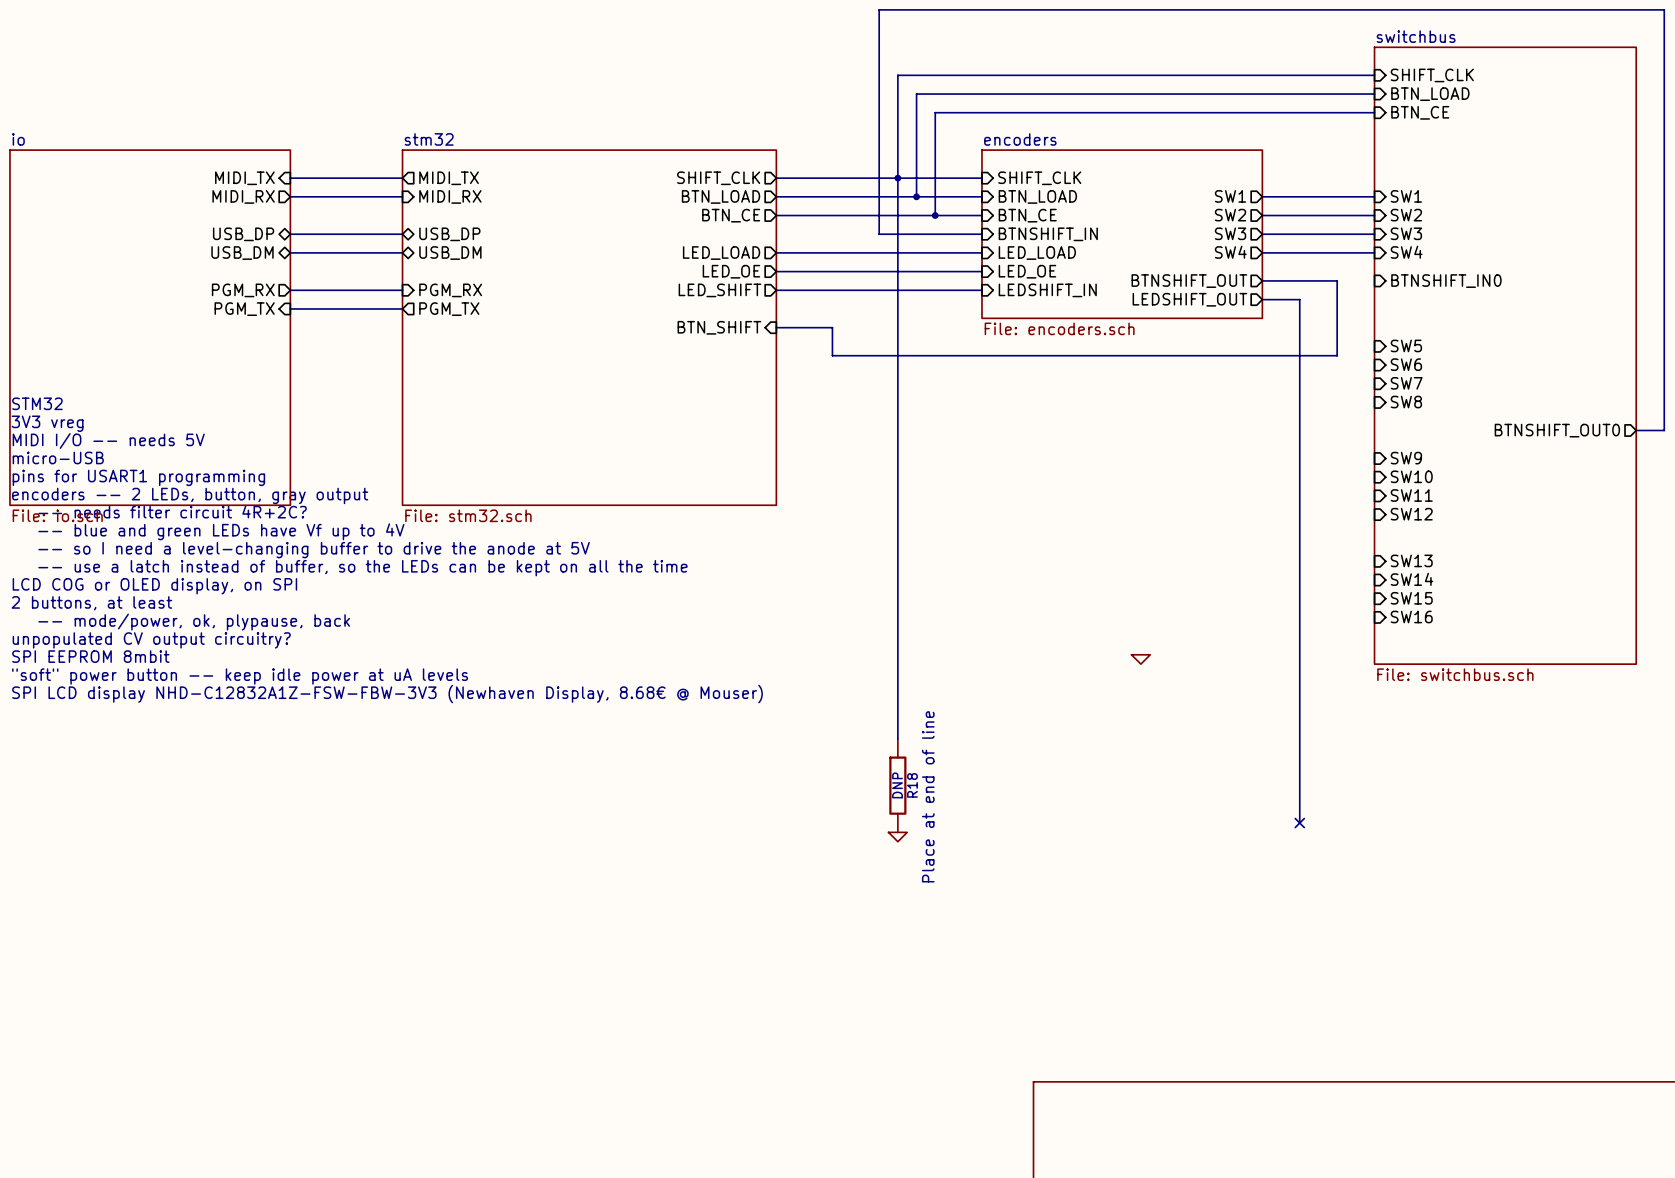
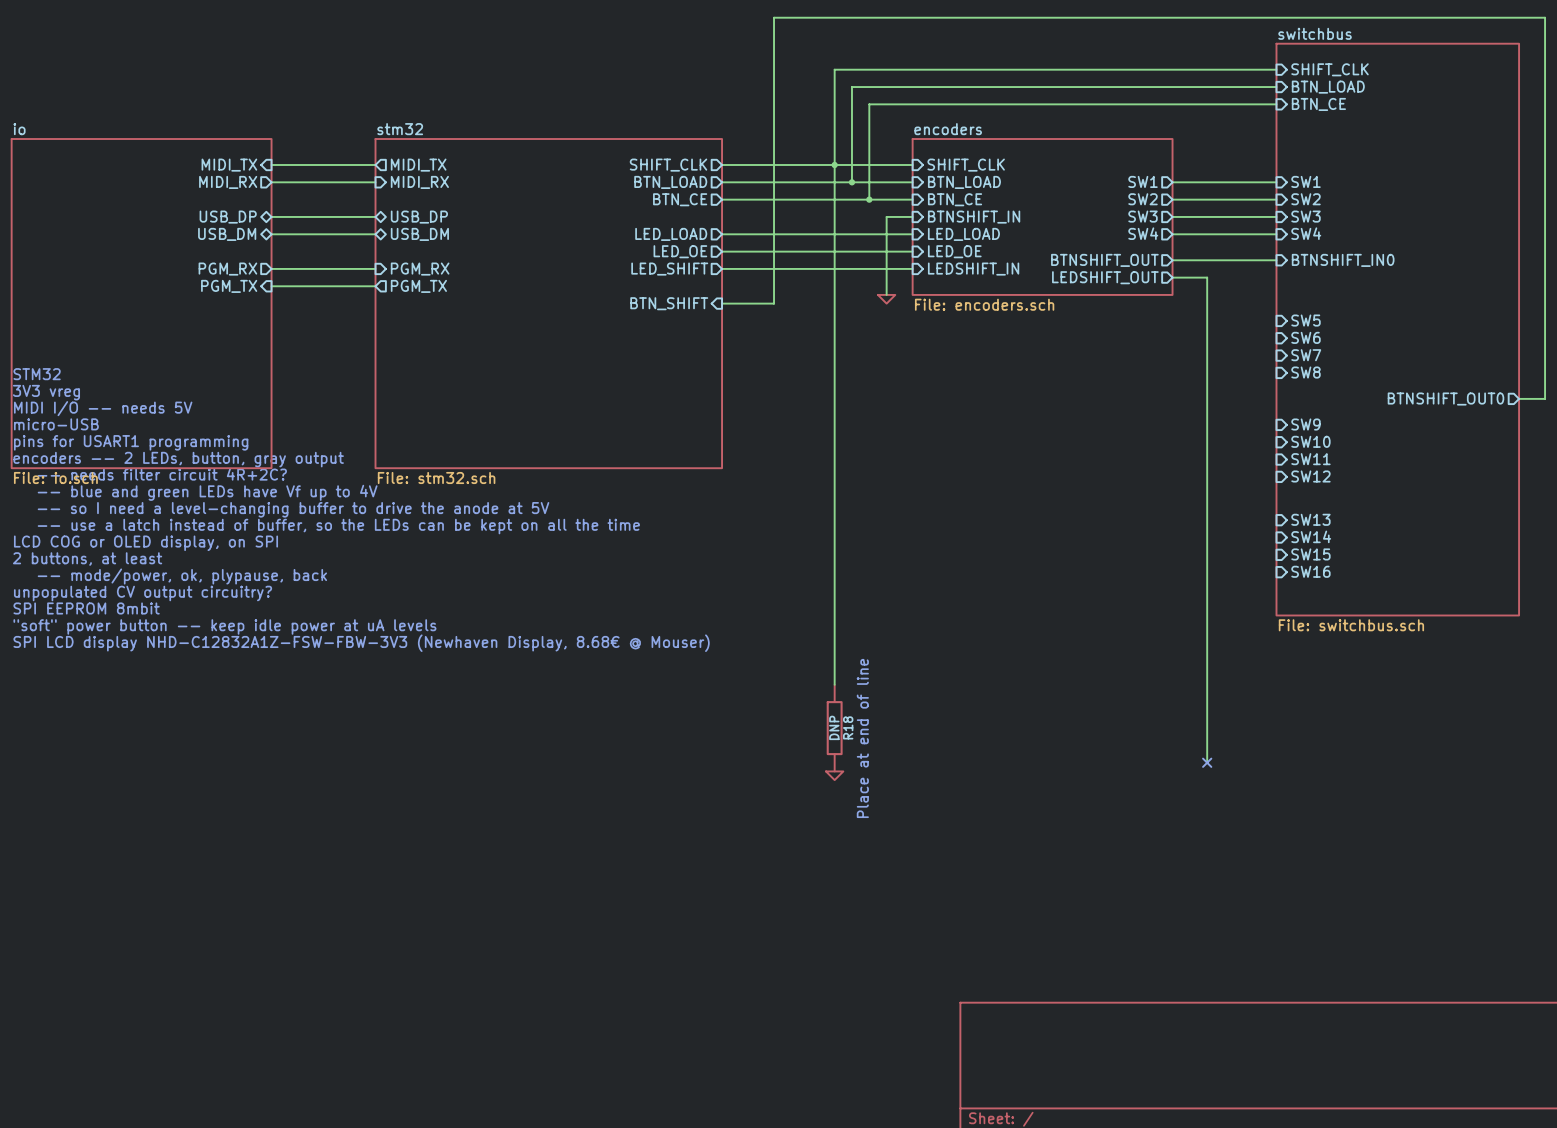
wire: (1664, 19) (1664, 9) (879, 9) (879, 234) (953, 234) -> (1545, 17) (774, 17) (774, 303)
wire: none -> (886, 216) (886, 294)
wire: (1337, 280) (1337, 355) (832, 355) (832, 327) -> (1241, 260) (1276, 260)
power symbol: none -> (886, 299)
power symbol: (1140, 659) -> none

